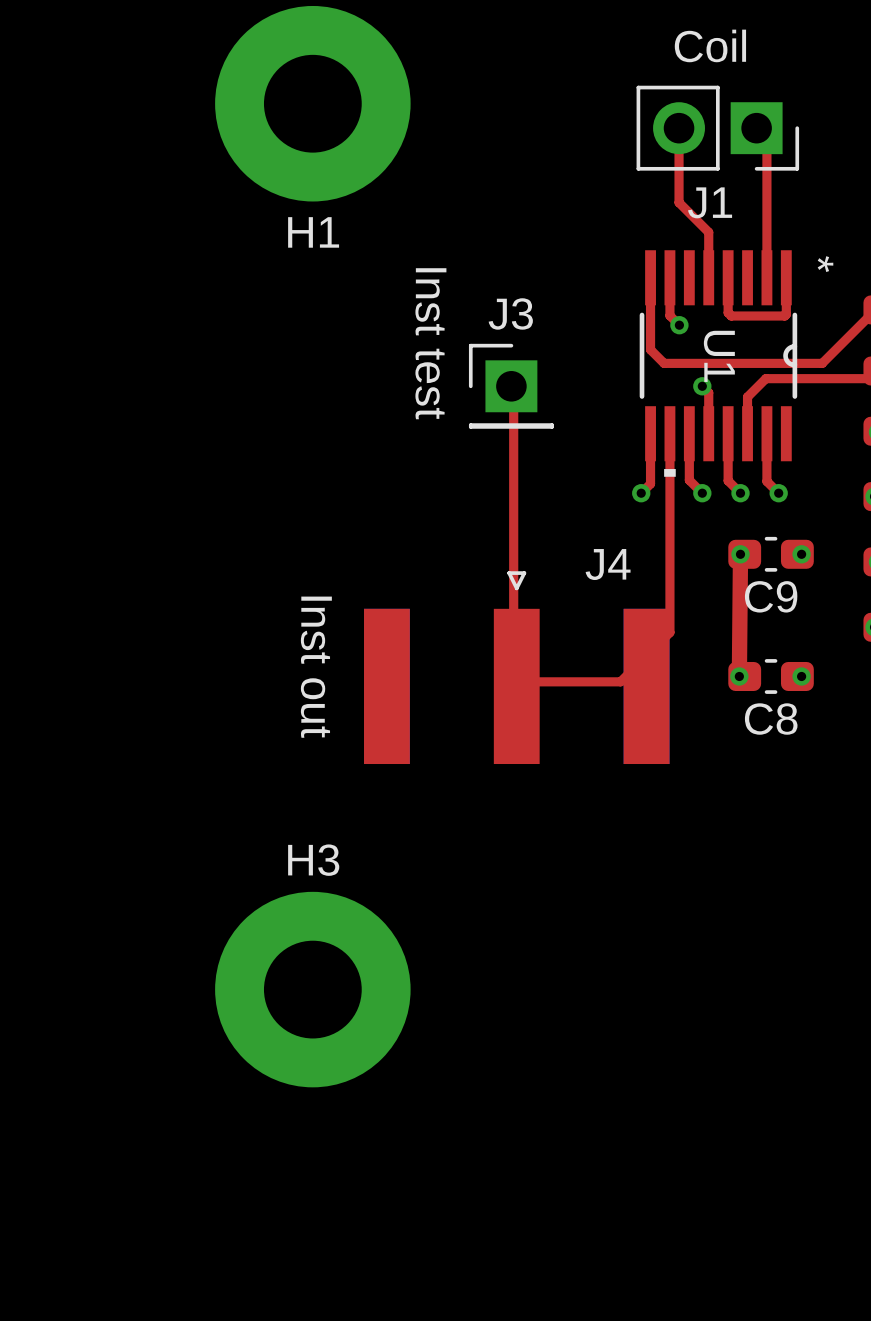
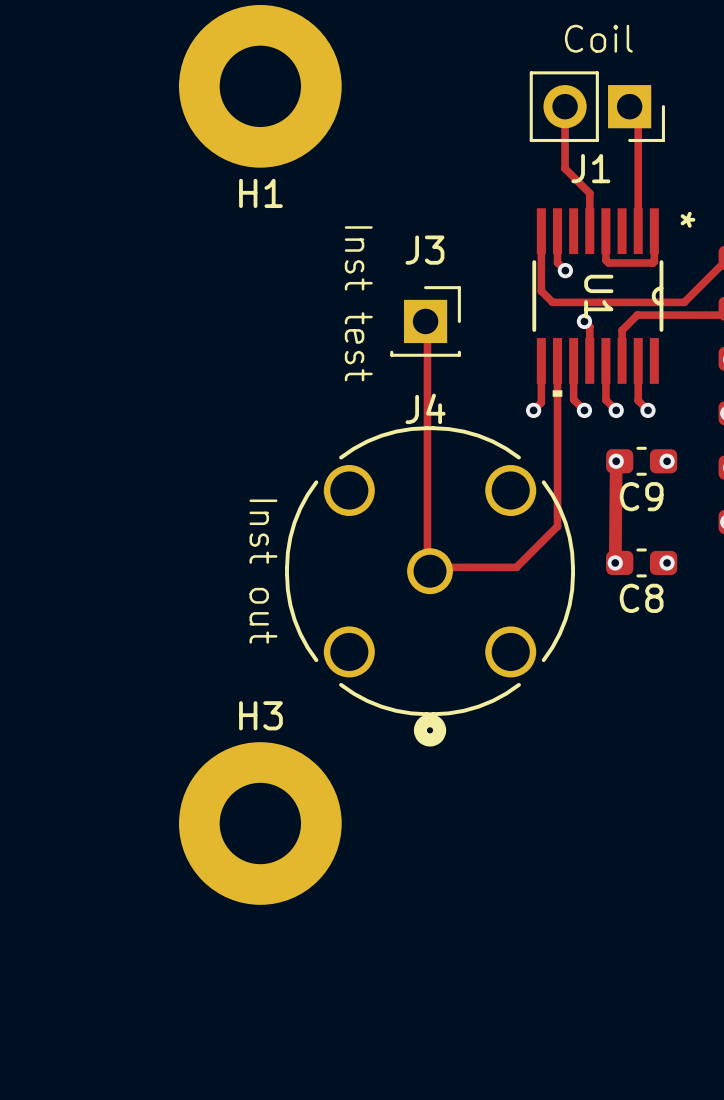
J3 footprint: [468, 343, 554, 429] -> [390, 286, 461, 357]
J4 name position: J4 (608, 564) -> J4 (425, 408)
J4 footprint: [364, 571, 670, 765] -> [285, 426, 575, 747]

